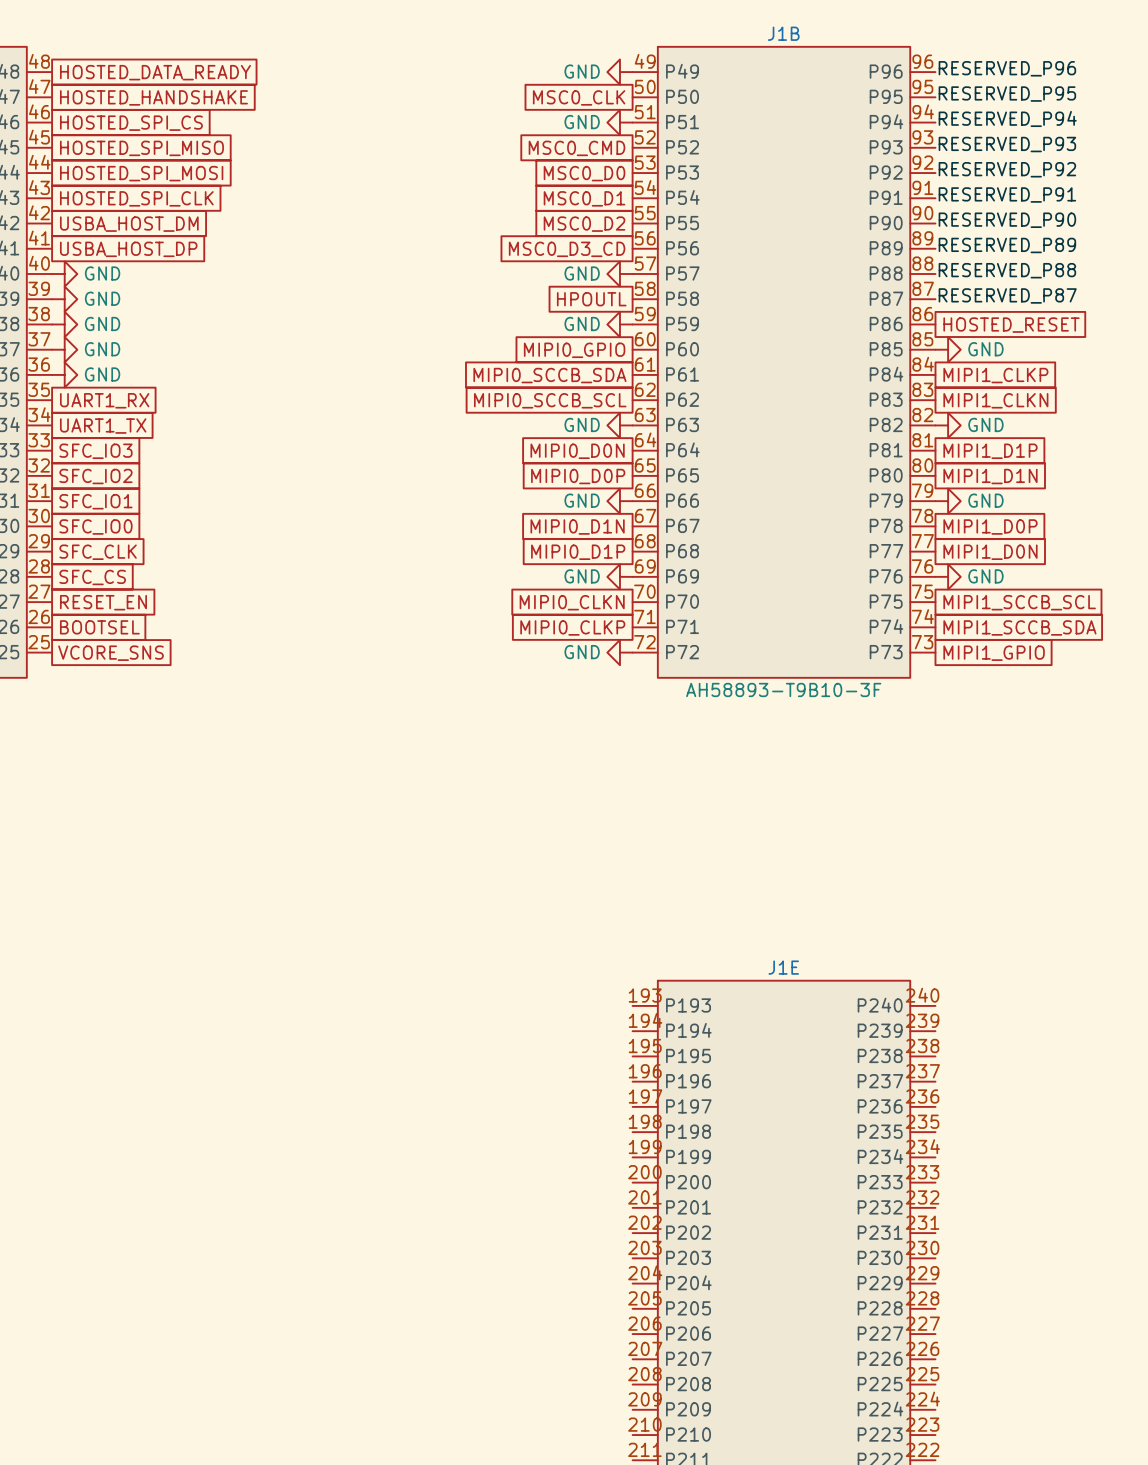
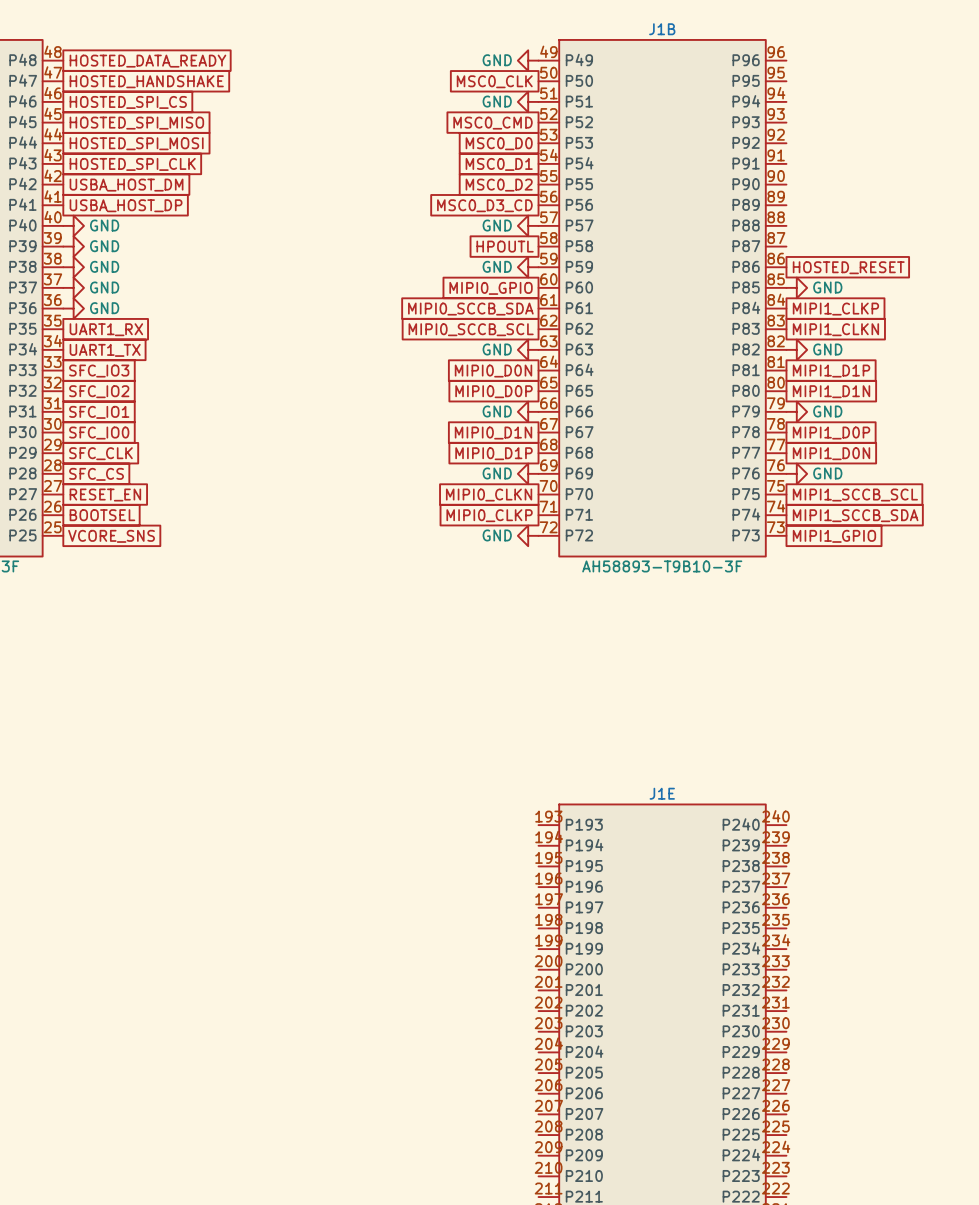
label: RESERVED_P96 (1007, 68) -> none
label: RESERVED_P95 (1007, 94) -> none
label: RESERVED_P94 (1007, 118) -> none
label: RESERVED_P93 (1007, 144) -> none
label: RESERVED_P92 (1007, 169) -> none
label: RESERVED_P91 (1007, 194) -> none
label: RESERVED_P90 (1007, 220) -> none
label: RESERVED_P89 (1007, 245) -> none
label: RESERVED_P88 (1007, 270) -> none
label: RESERVED_P87 (1007, 295) -> none

